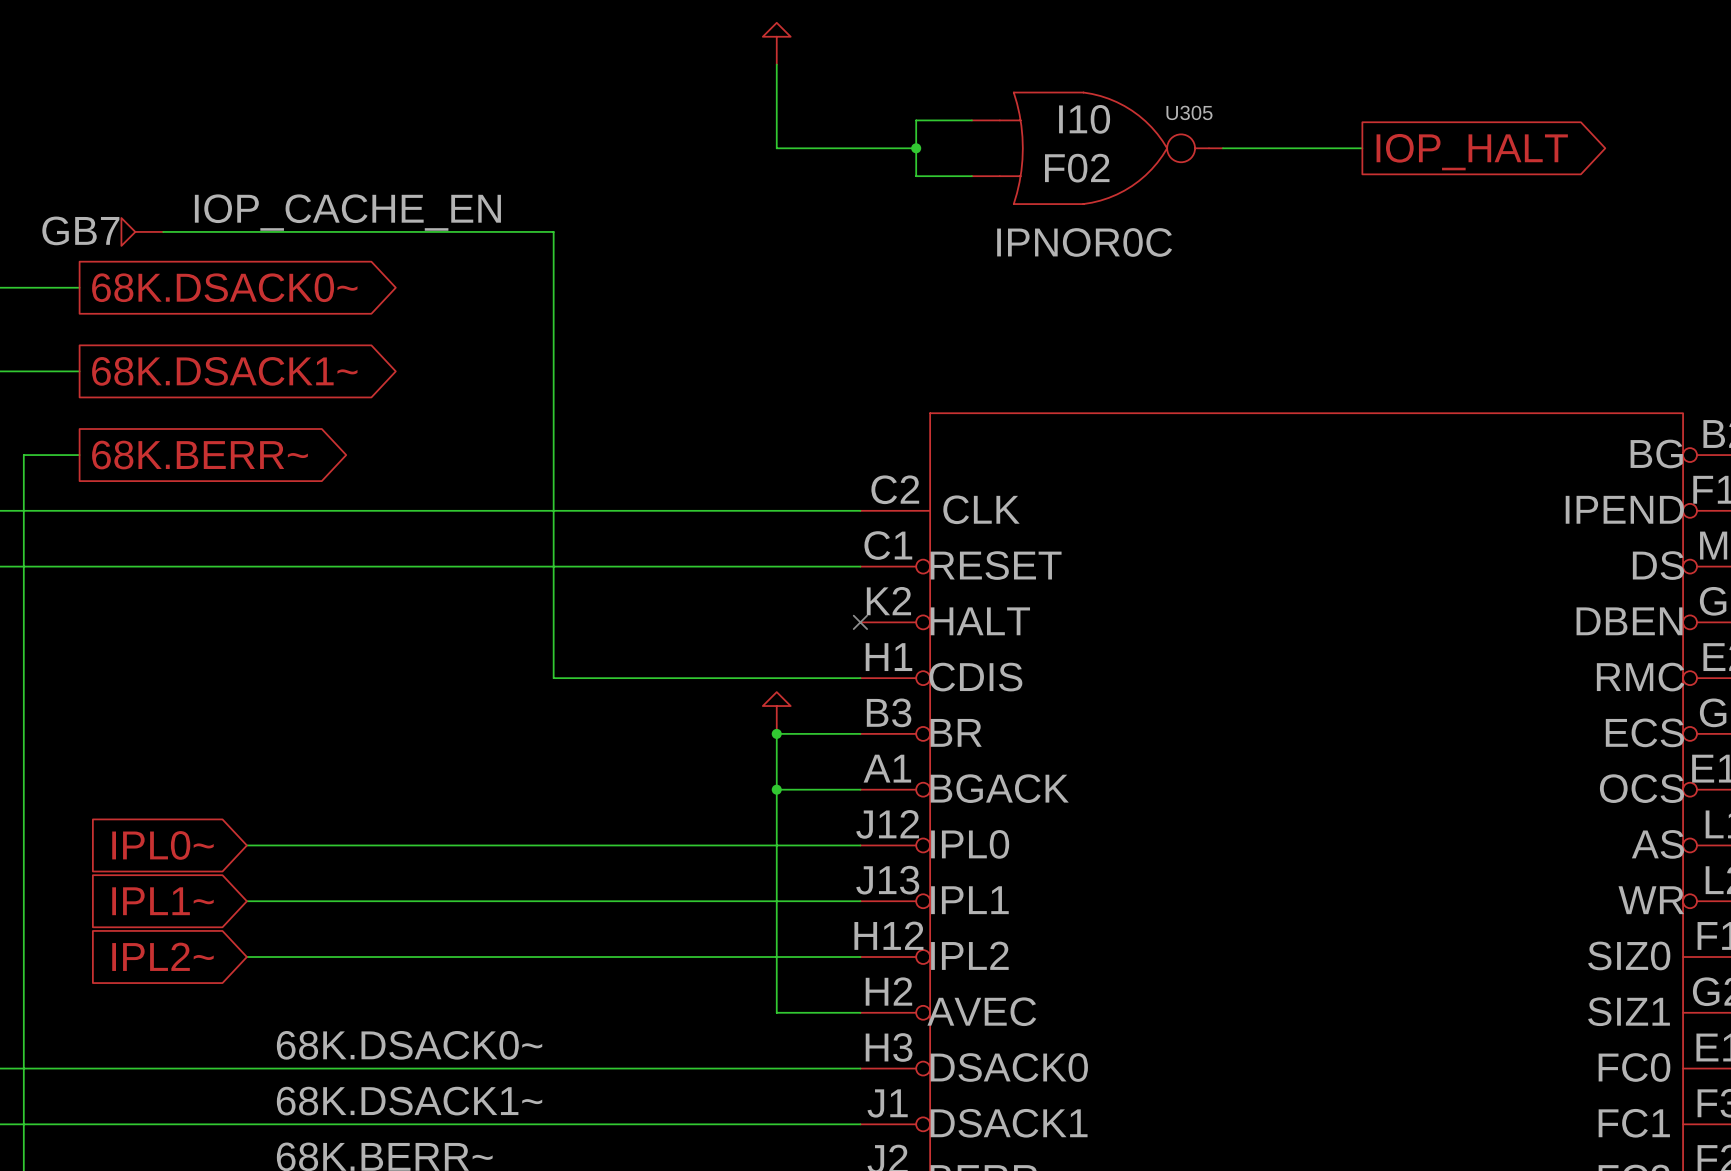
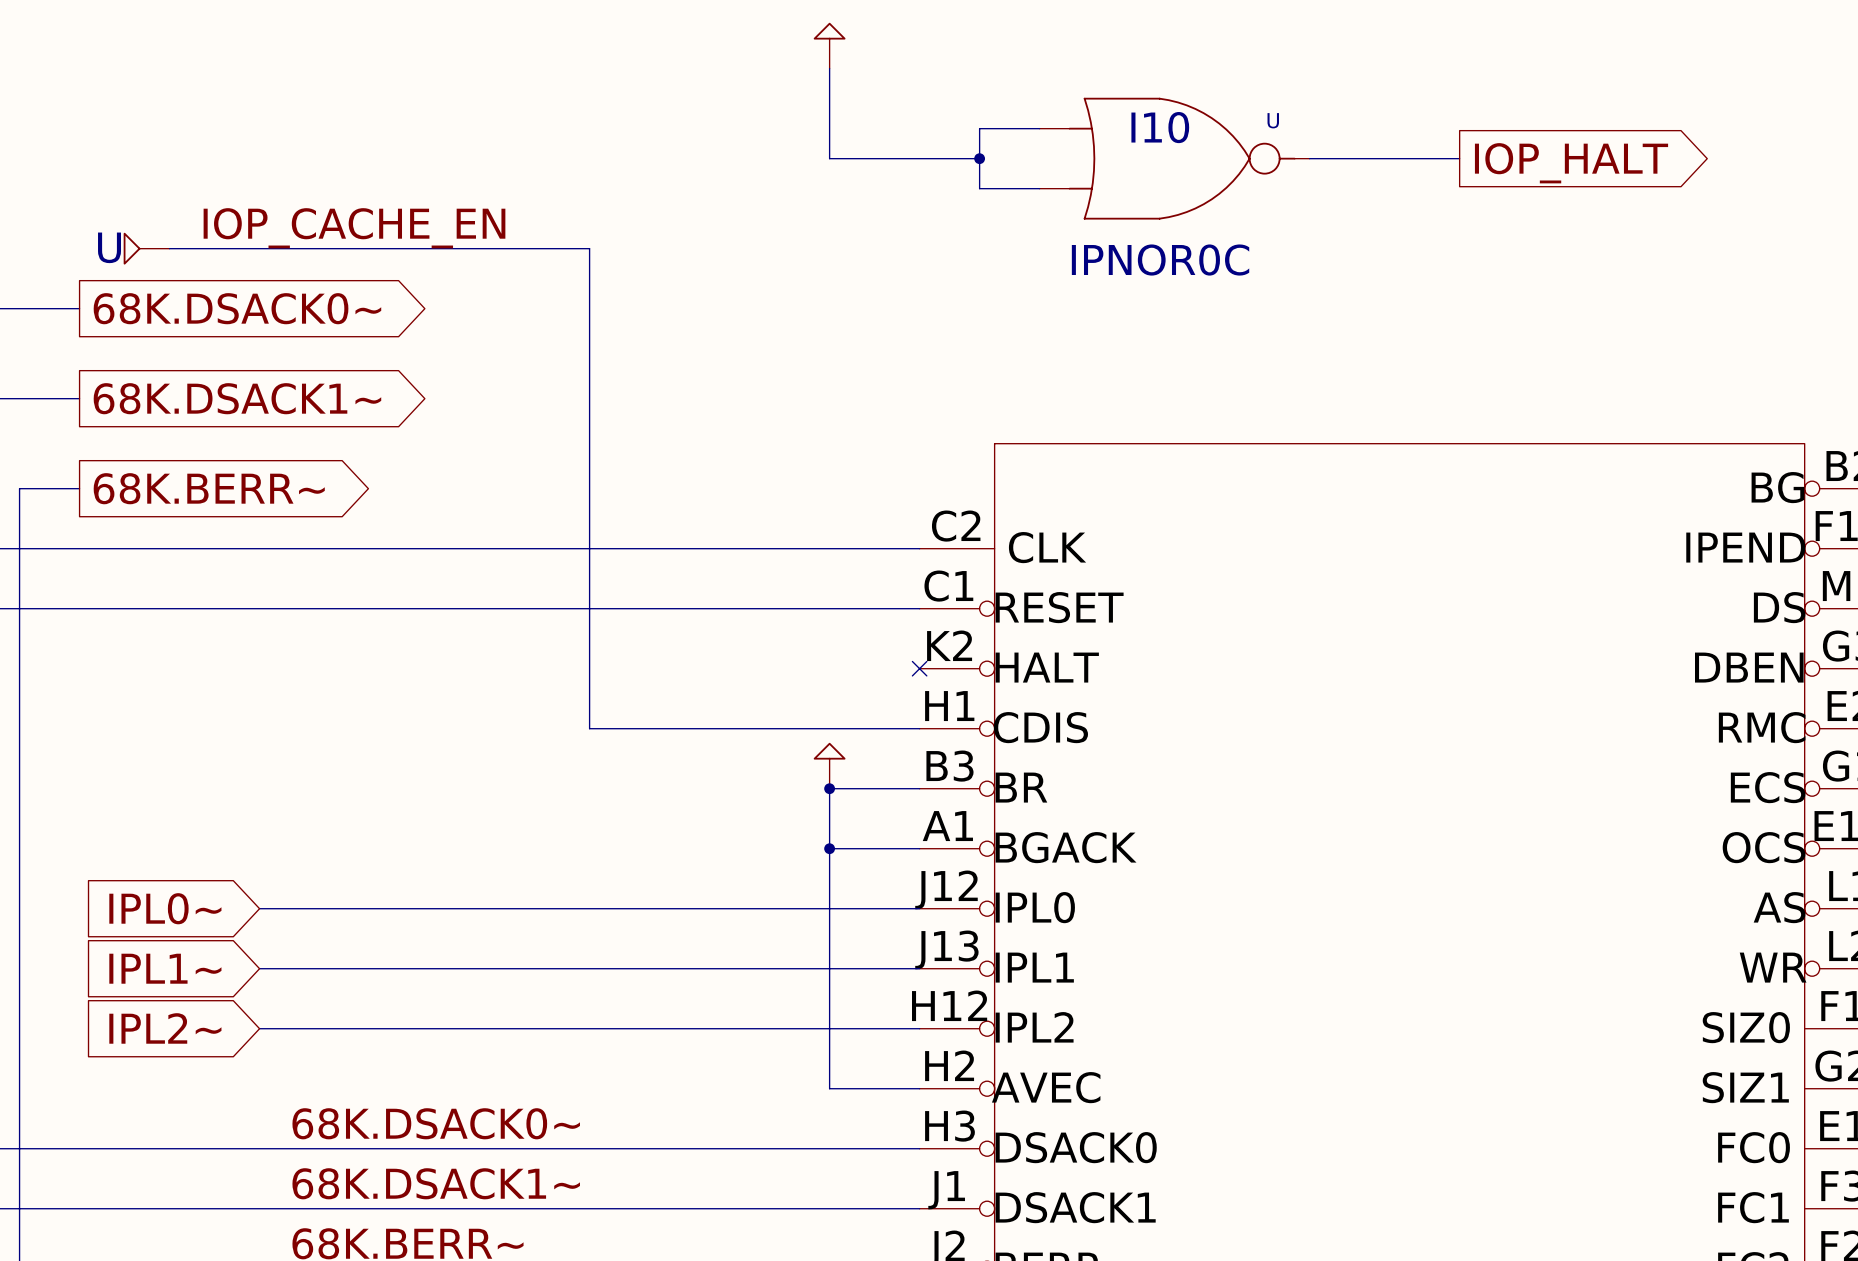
U305 name: U305 (1189, 112) -> U (1273, 120)
U305 value: F02 (1077, 168) -> none
GB7 name: GB7 (80, 230) -> U (109, 247)

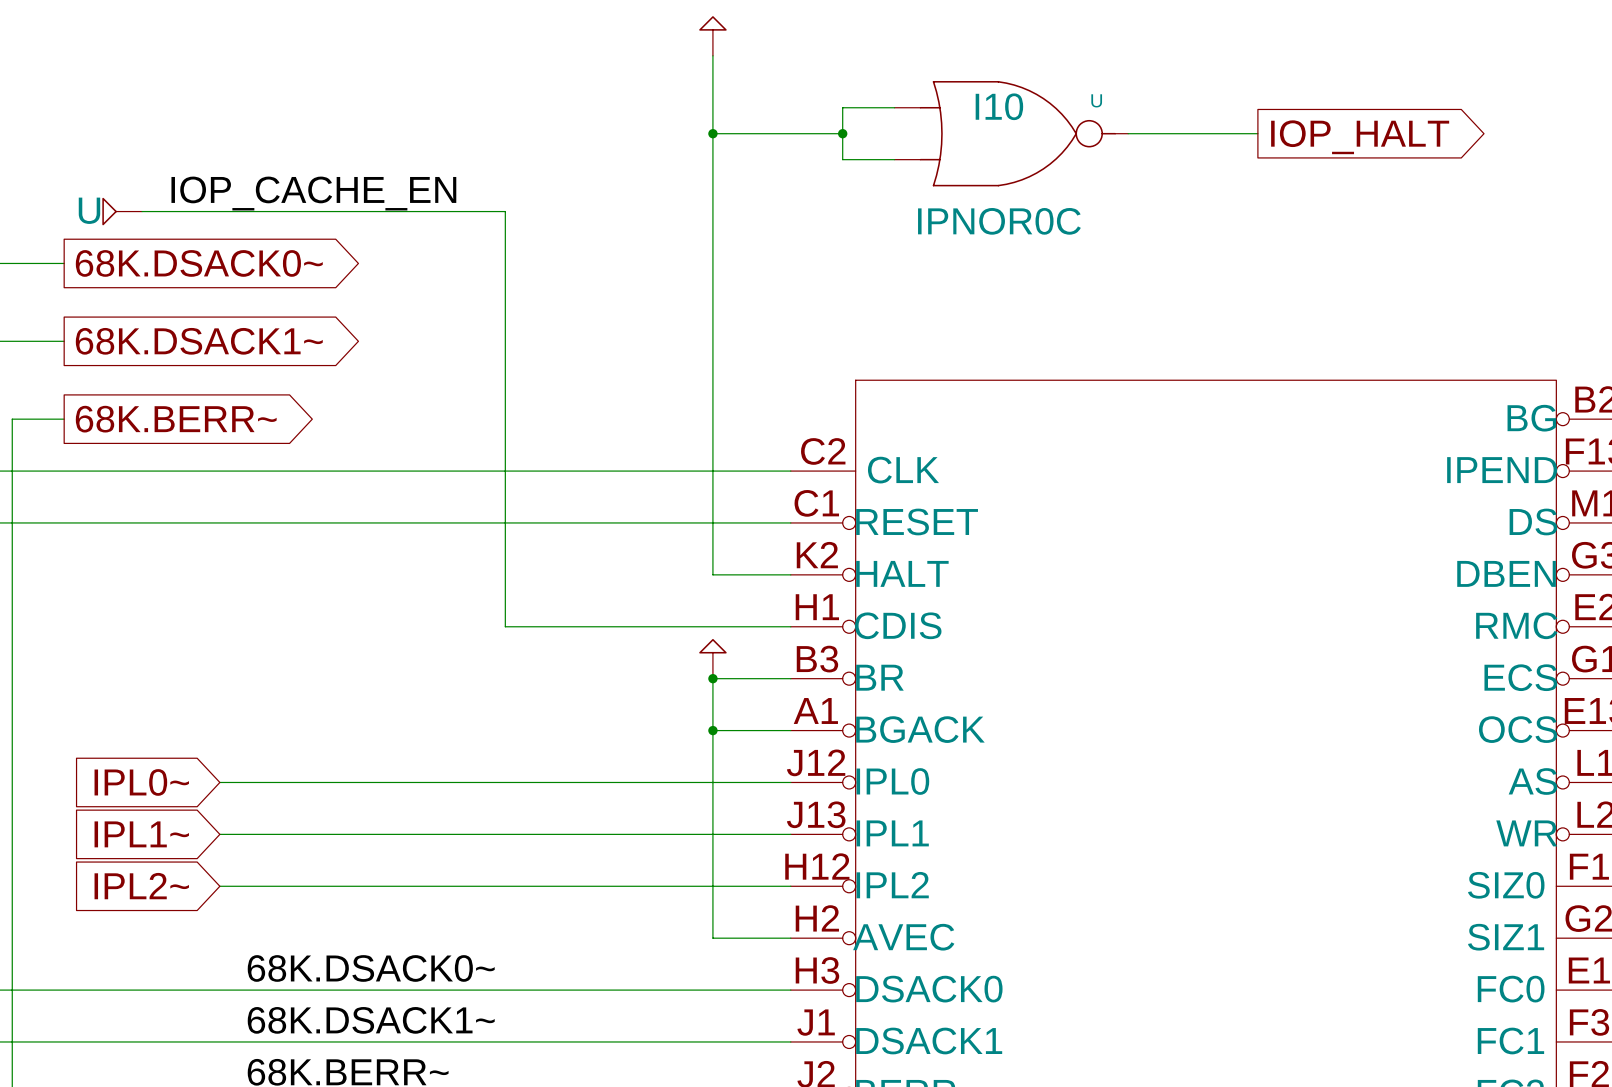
wire: none -> (712, 133) (712, 574) (790, 574)
junction: none -> (712, 133)
no-connect mark: (919, 668) -> none

